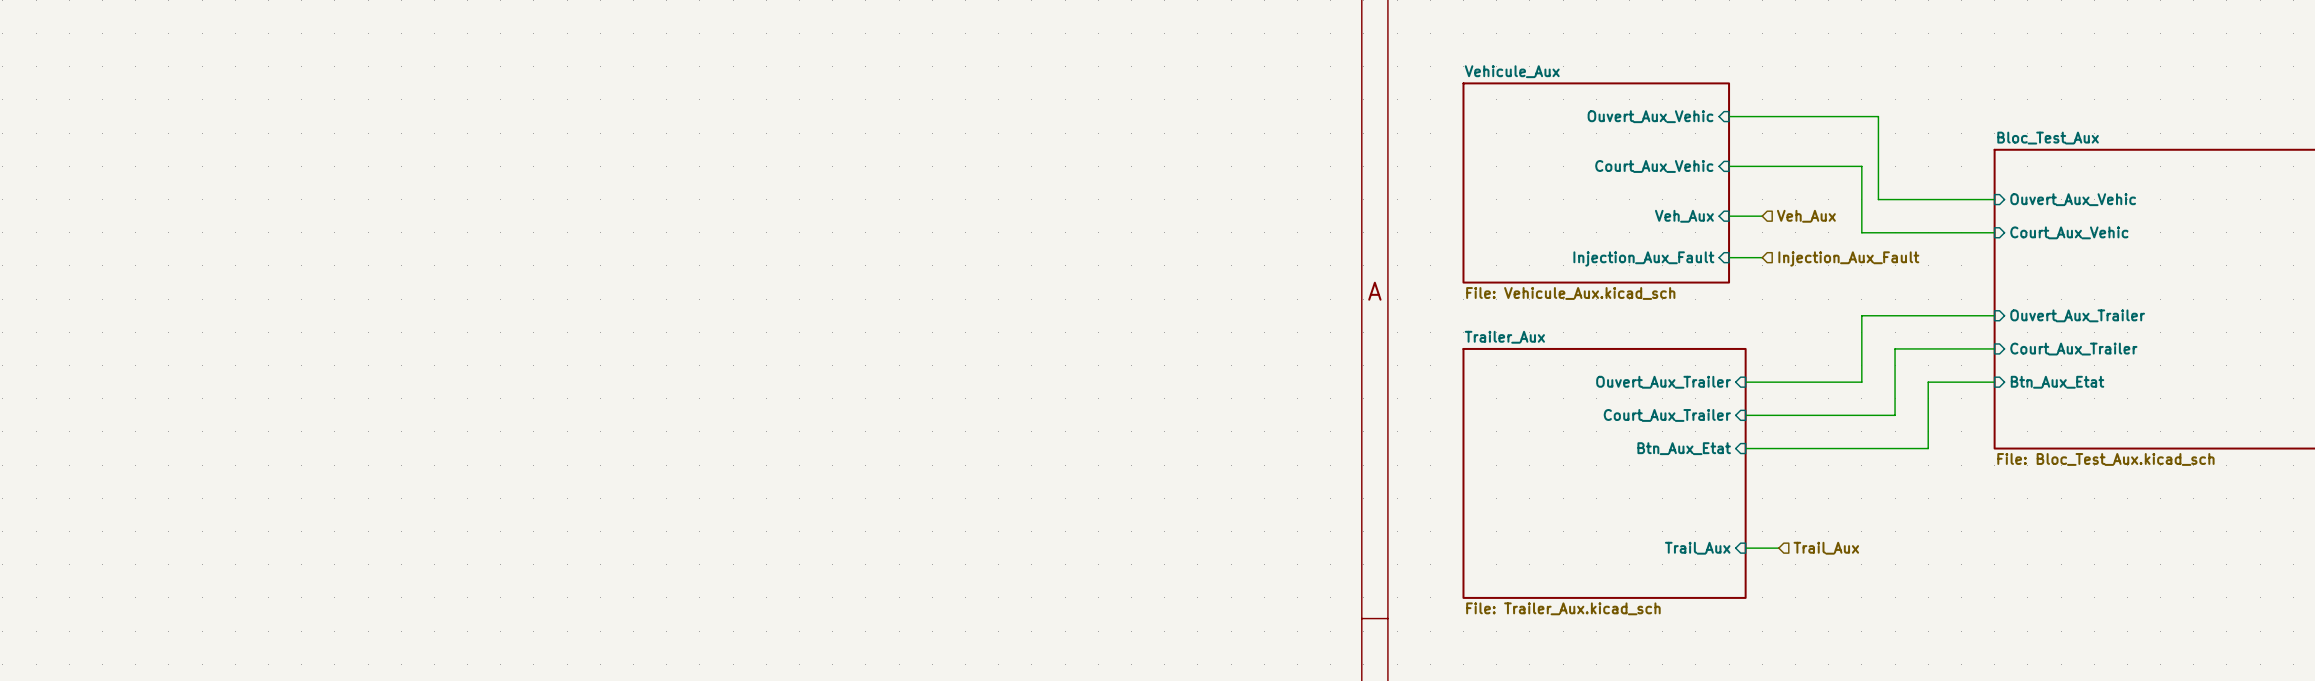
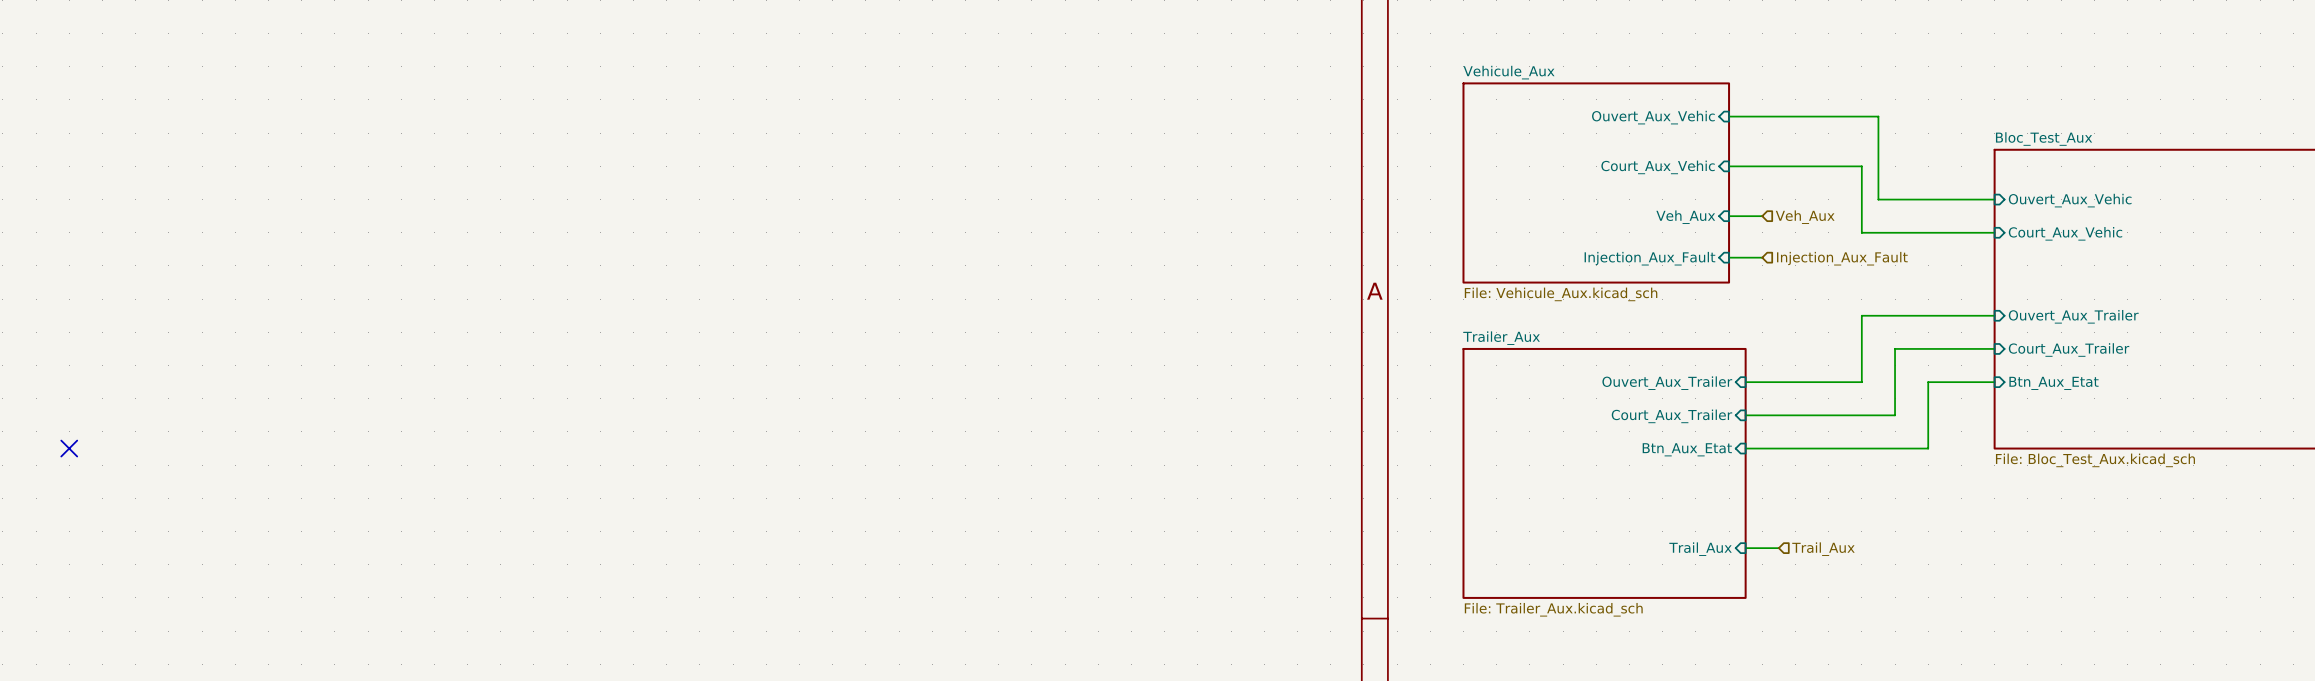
no-connect mark: none -> (69, 448)

